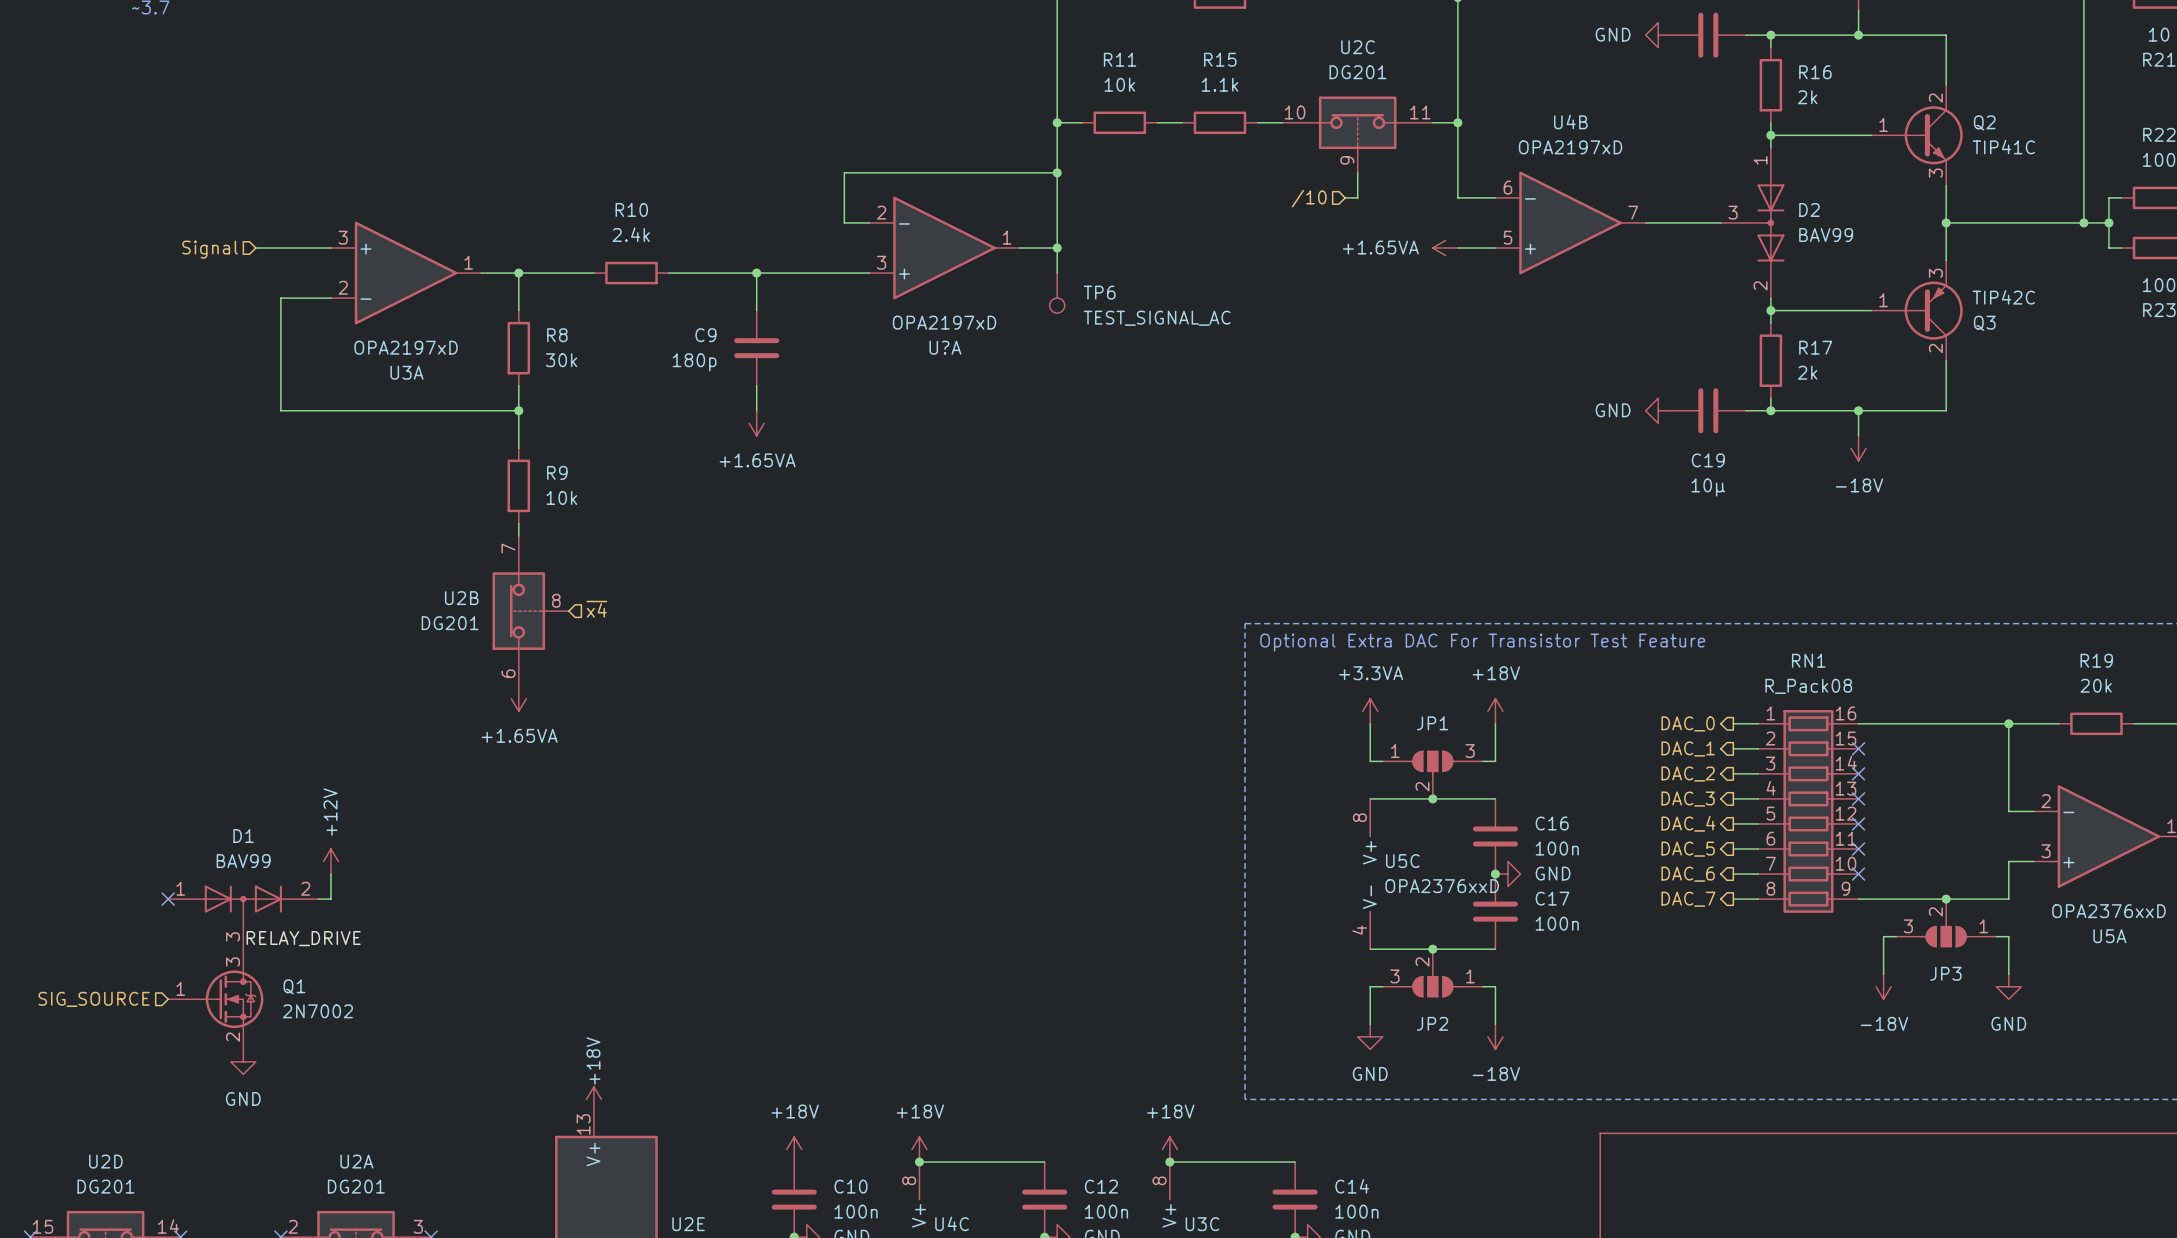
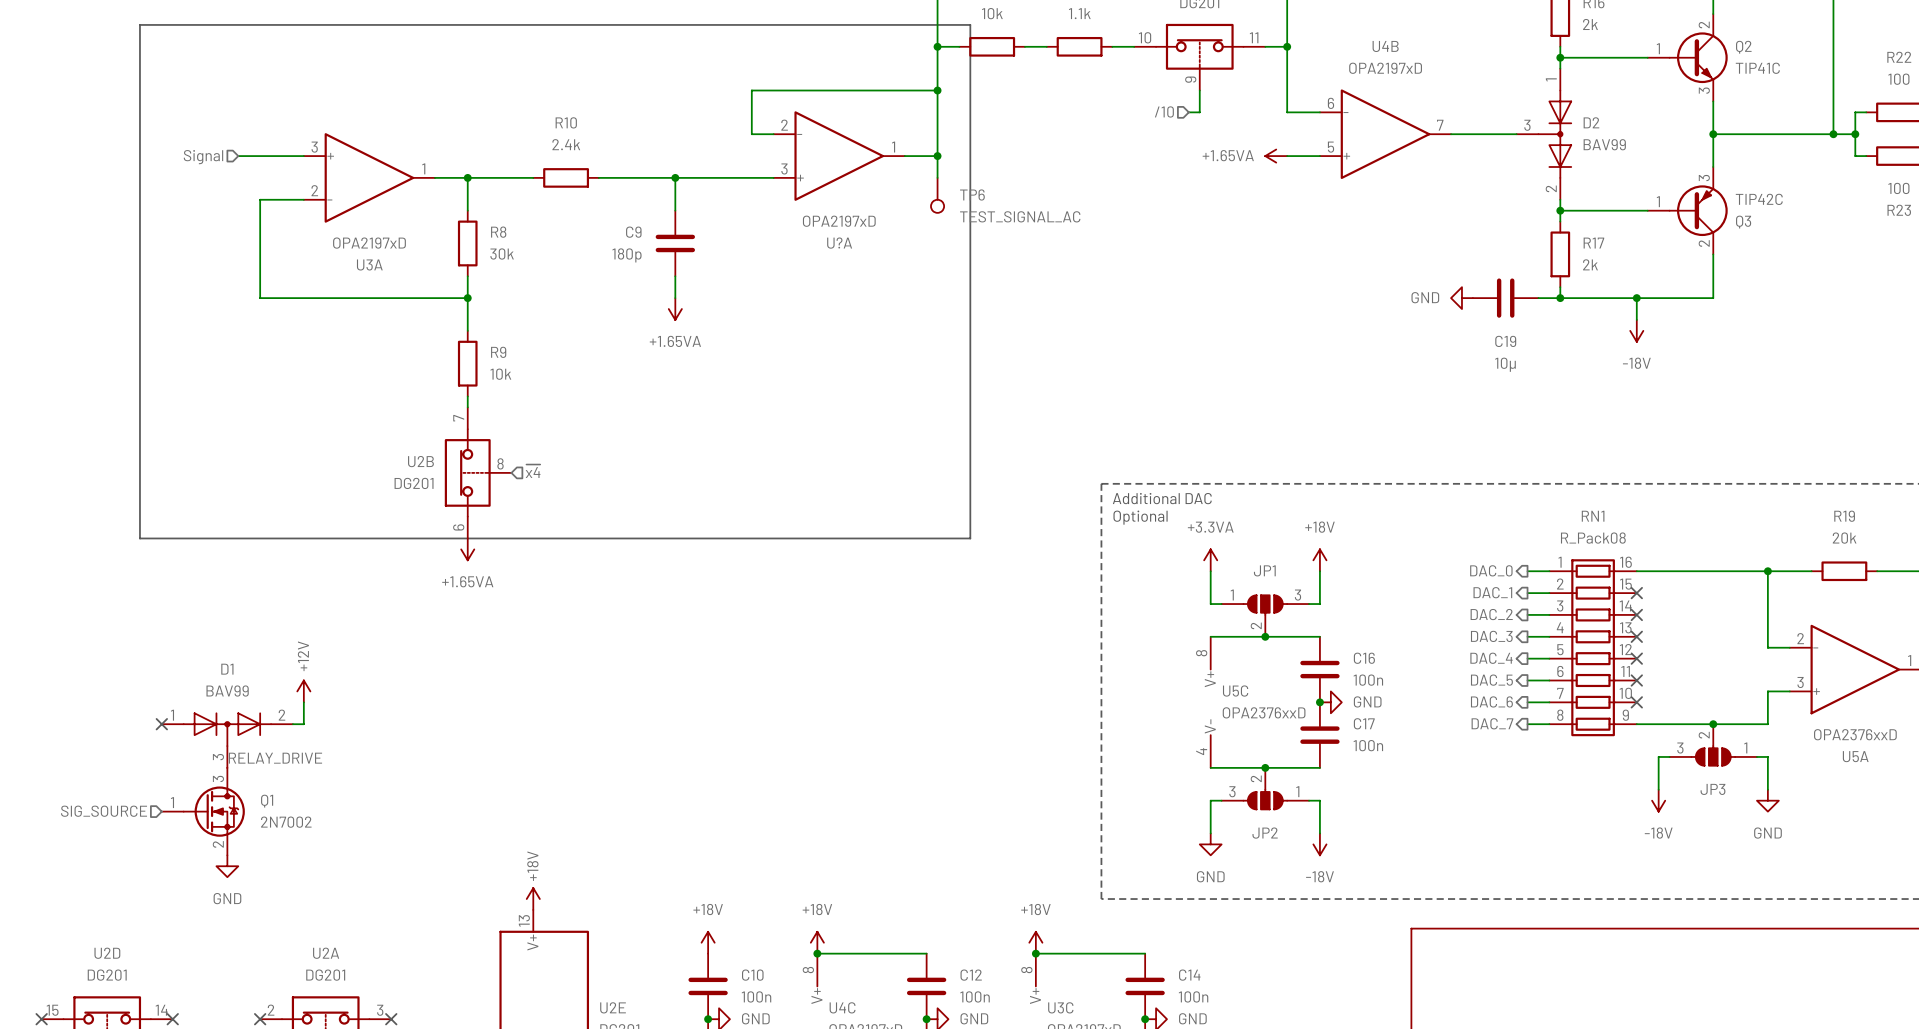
line: none -> (139, 24) (970, 24) (970, 538) (139, 538) (139, 24)
text: Optional Extra DAC For Transistor Test Feature (1482, 642) -> Additional DAC (1162, 498)
text: none -> Optional (1140, 517)

